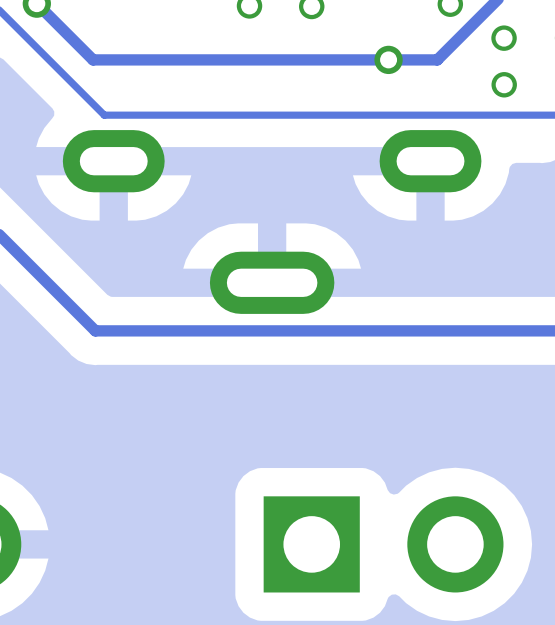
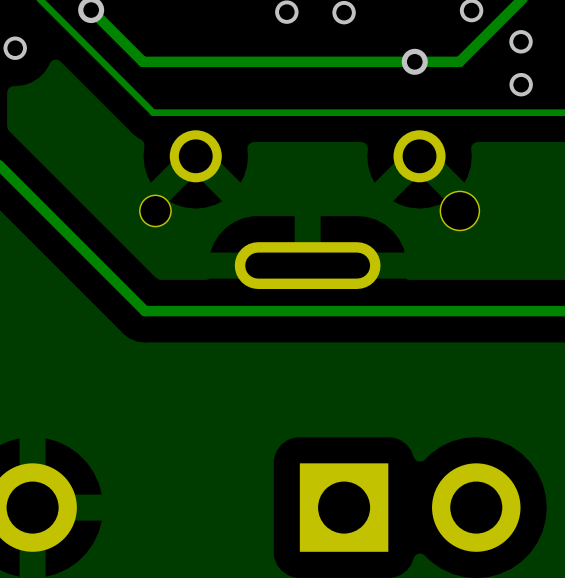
part footprint: [62, 130, 482, 314] -> [139, 130, 480, 290]

